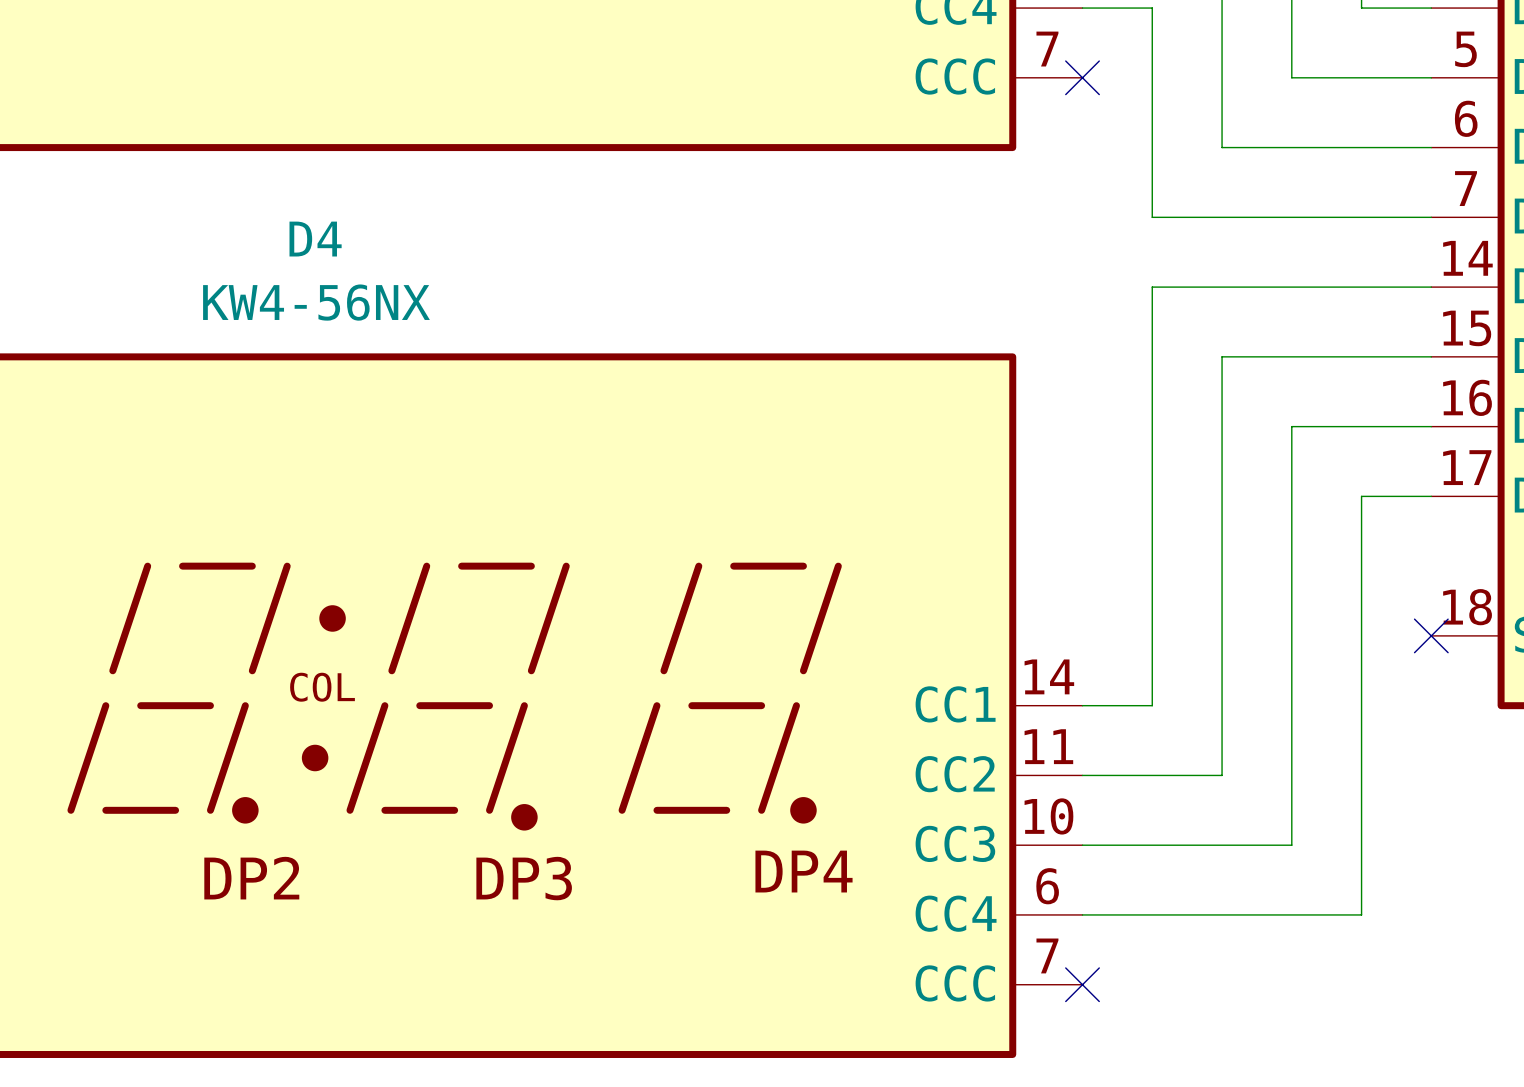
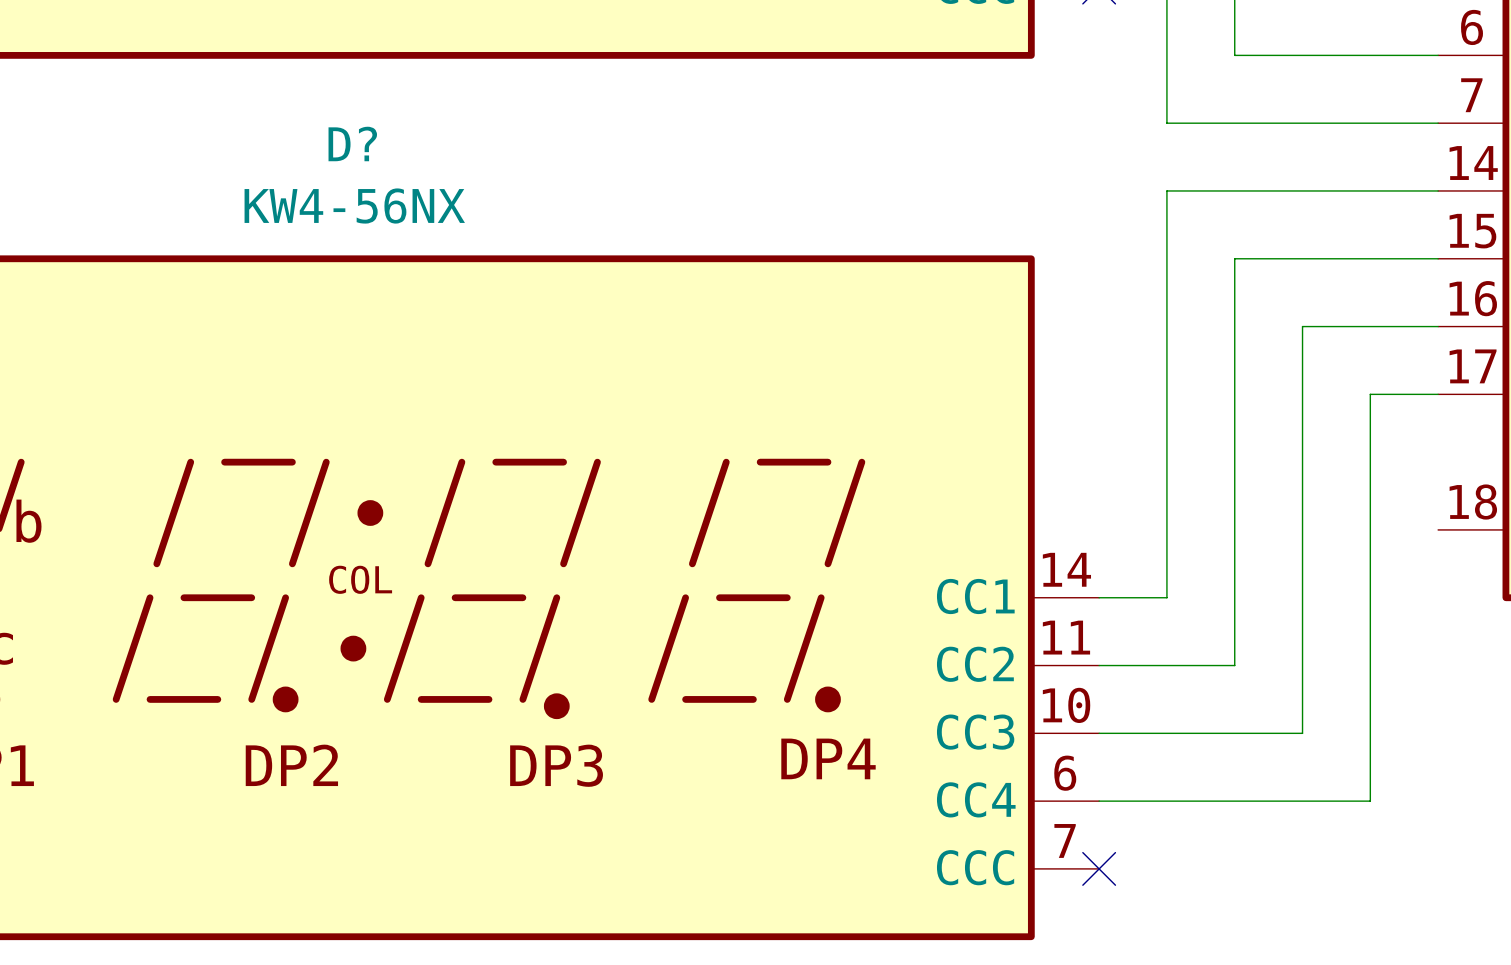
D4 name: D4 (315, 239) -> D? (352, 143)
no-connect mark: (1431, 635) -> none

